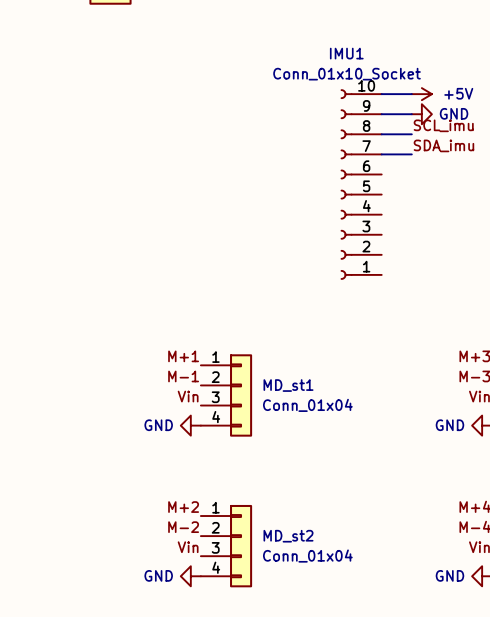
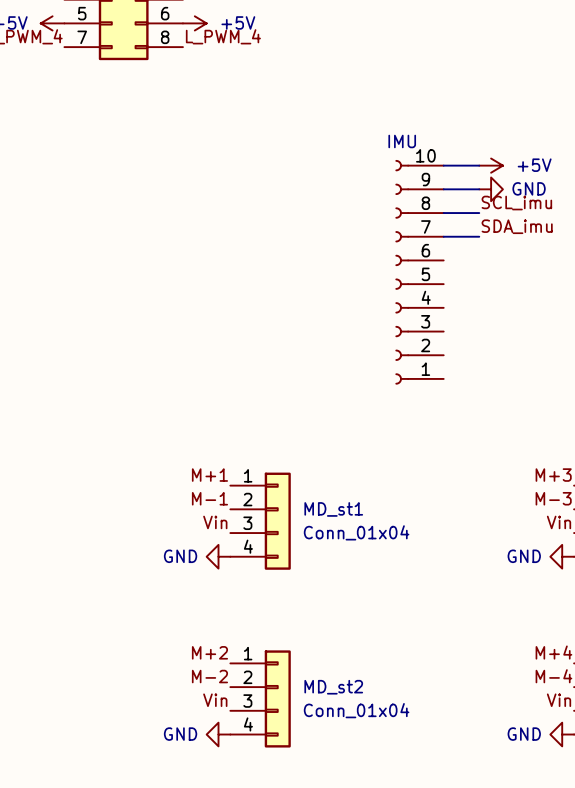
IMU1 name: IMU1 (346, 53) -> none
IMU1 value: Conn_01x10_Socket (347, 74) -> IMU (402, 141)

